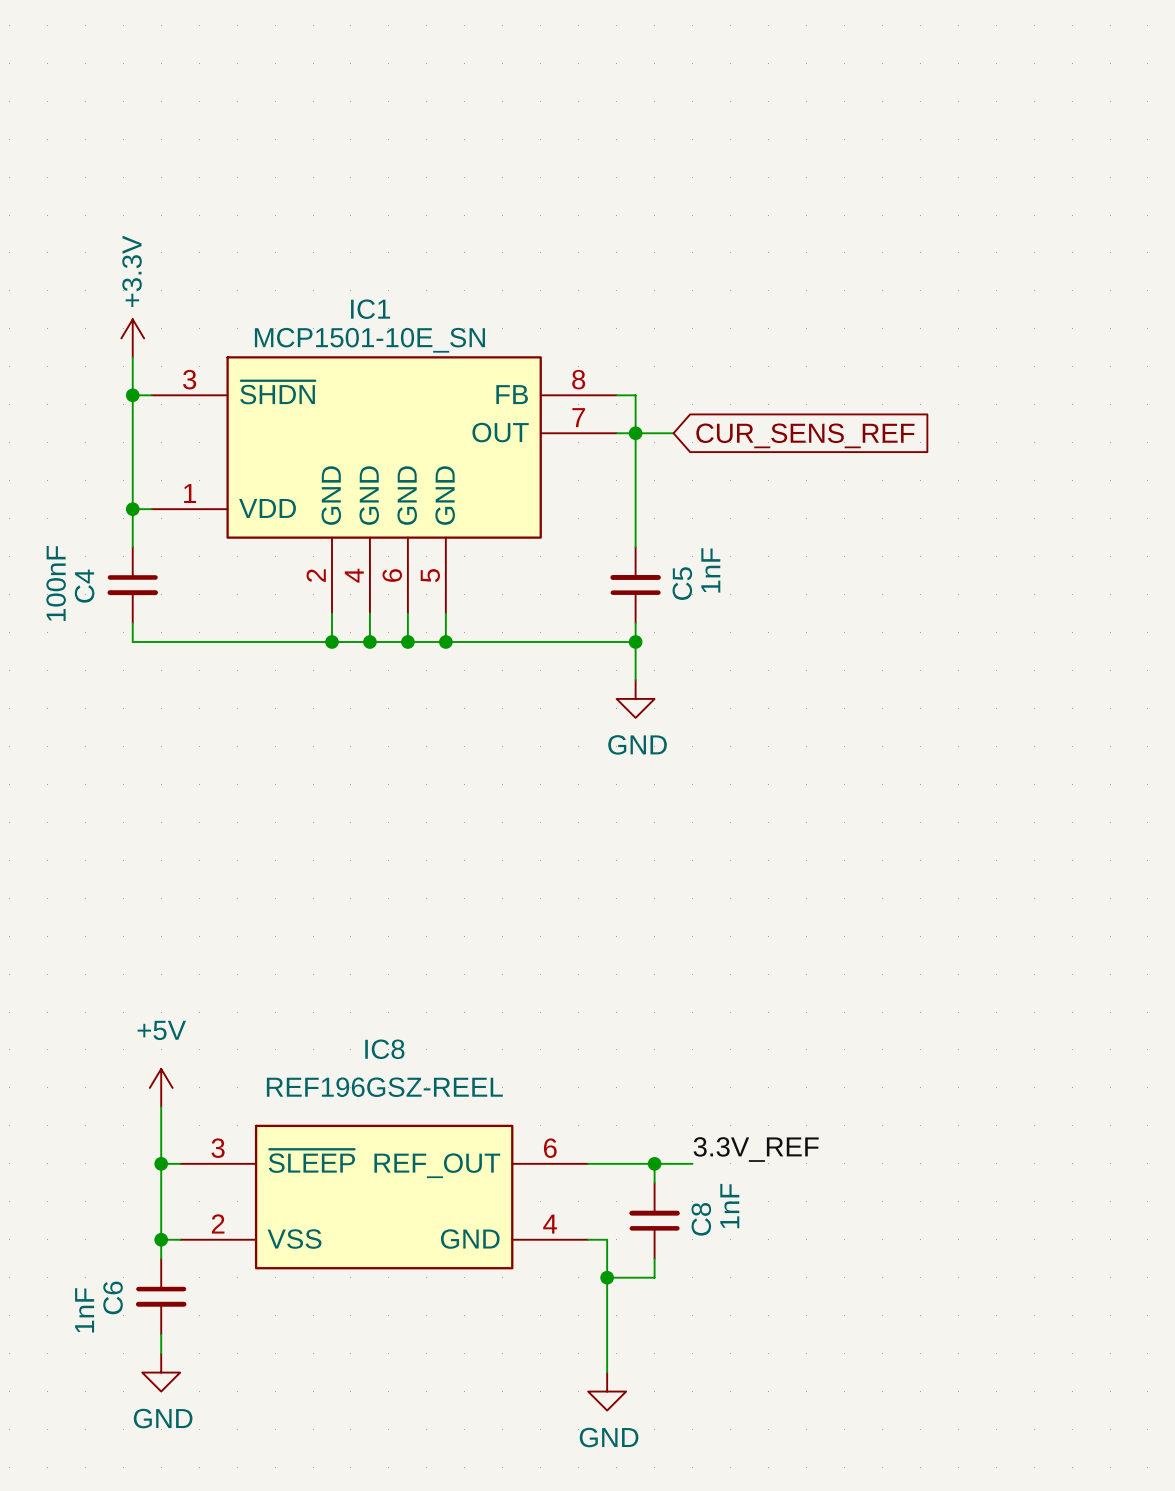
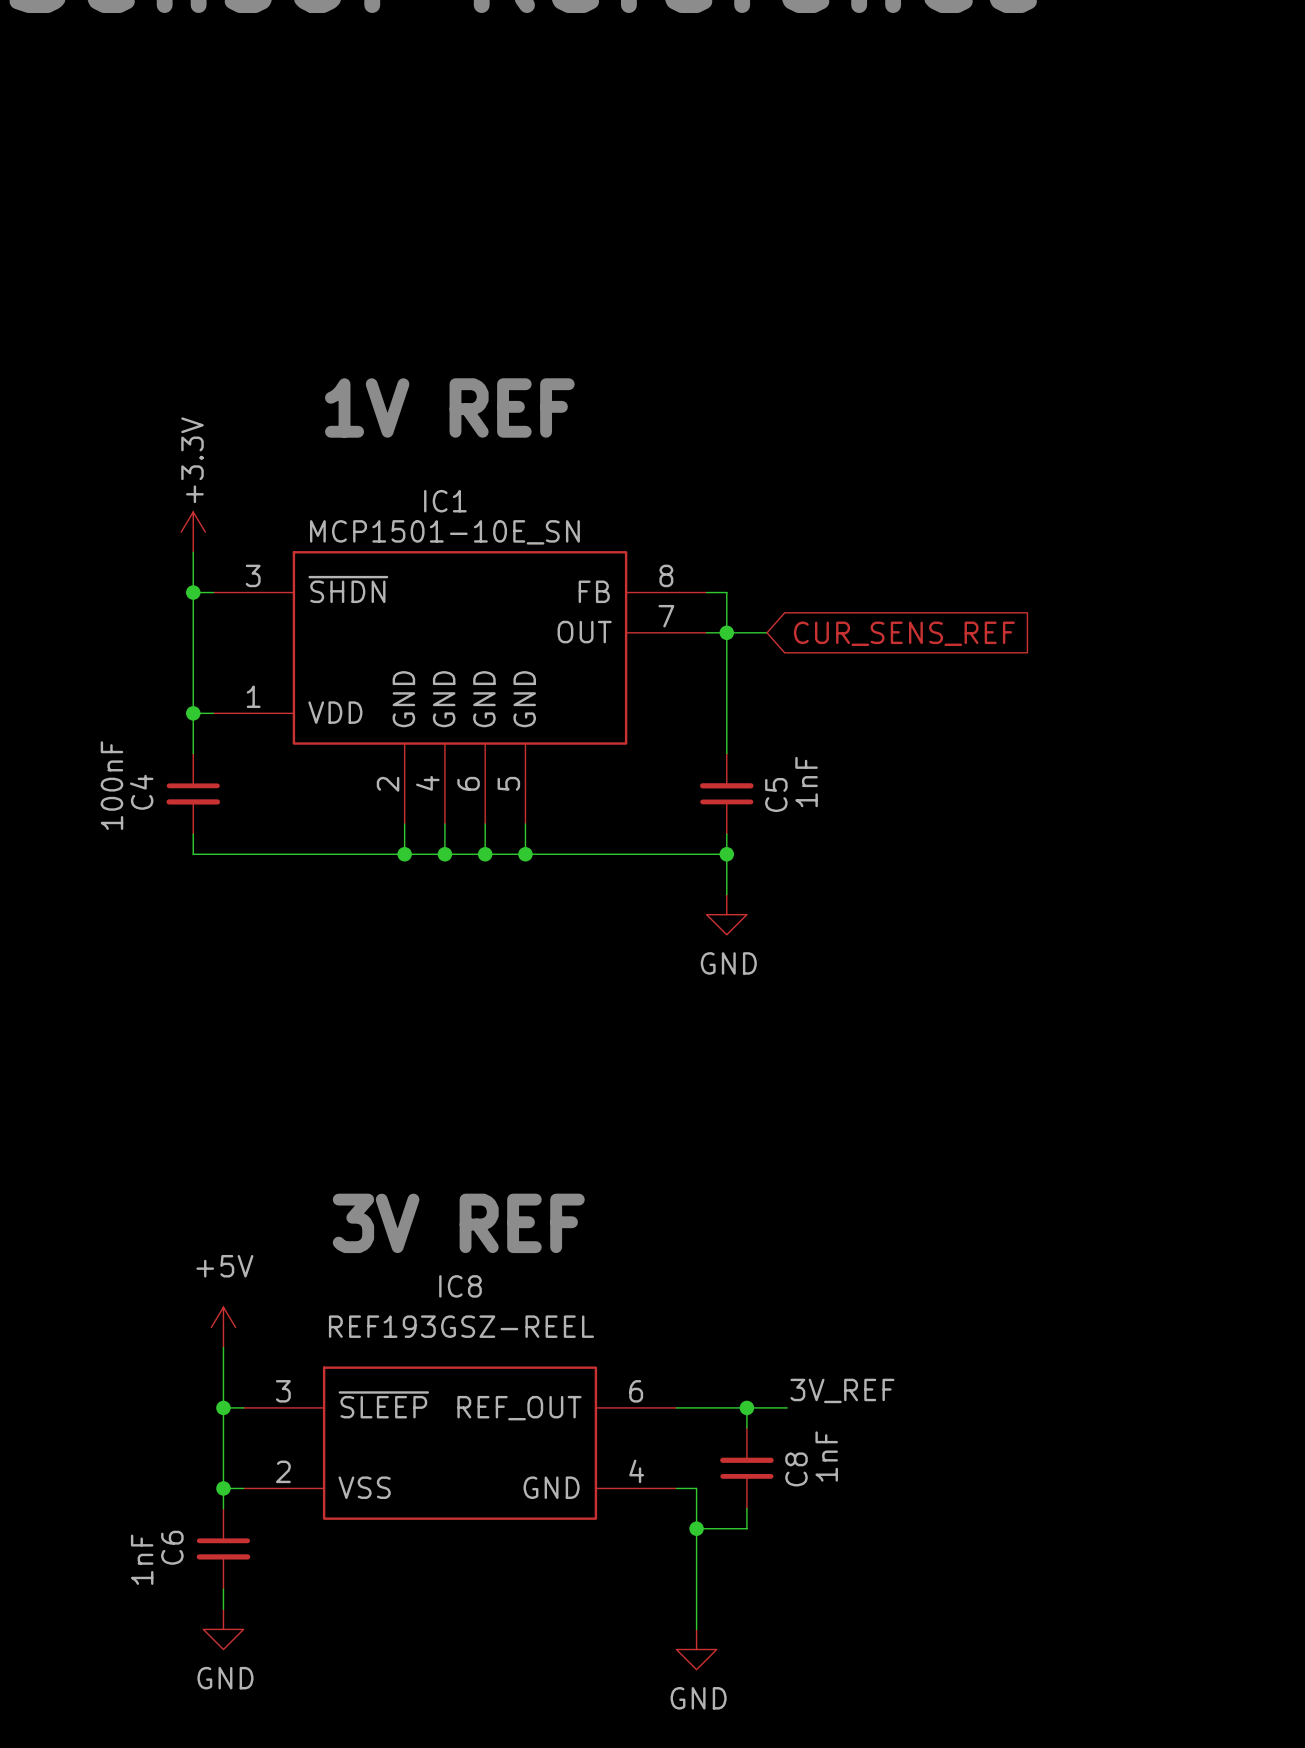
text: none -> 1V REF (449, 407)
text: none -> 3V REF (458, 1223)
IC8 value: REF196GSZ-REEL (384, 1087) -> REF193GSZ-REEL (461, 1326)
label: 3.3V_REF (756, 1149) -> 3V_REF (842, 1390)

